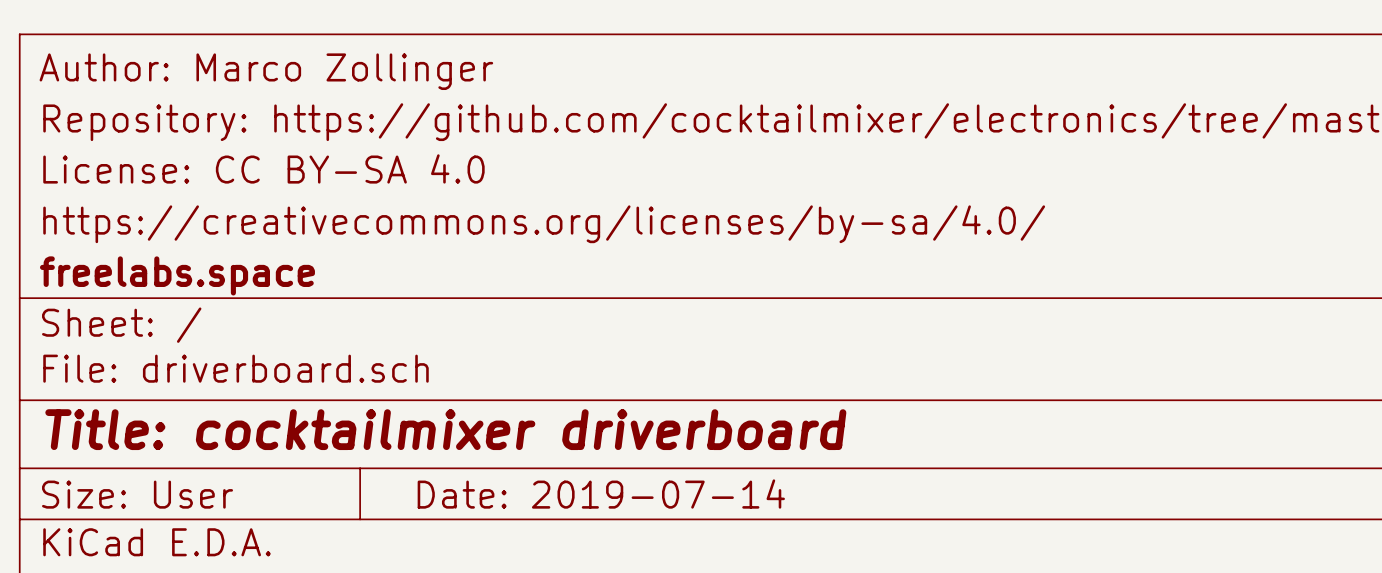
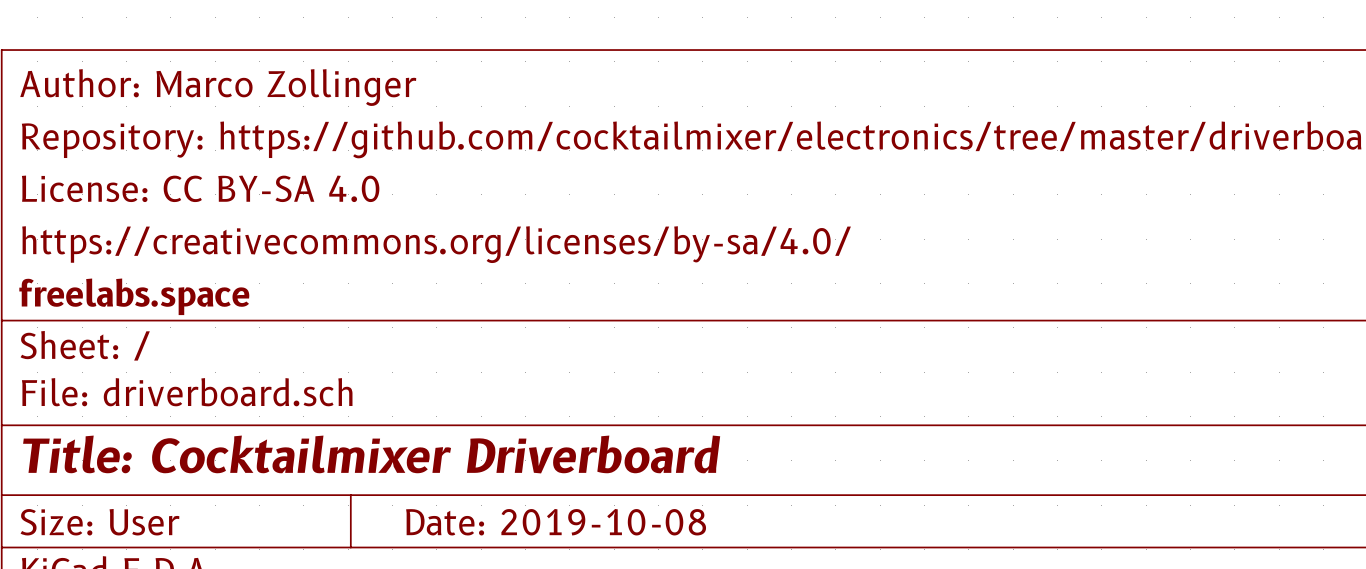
title block: Title: cocktailmixer driverboard (445, 429) -> Title: Cocktailmixer Driverboard (371, 454)
title block: Date: 2019-07-14 (601, 494) -> Date: 2019-10-08 (556, 522)

